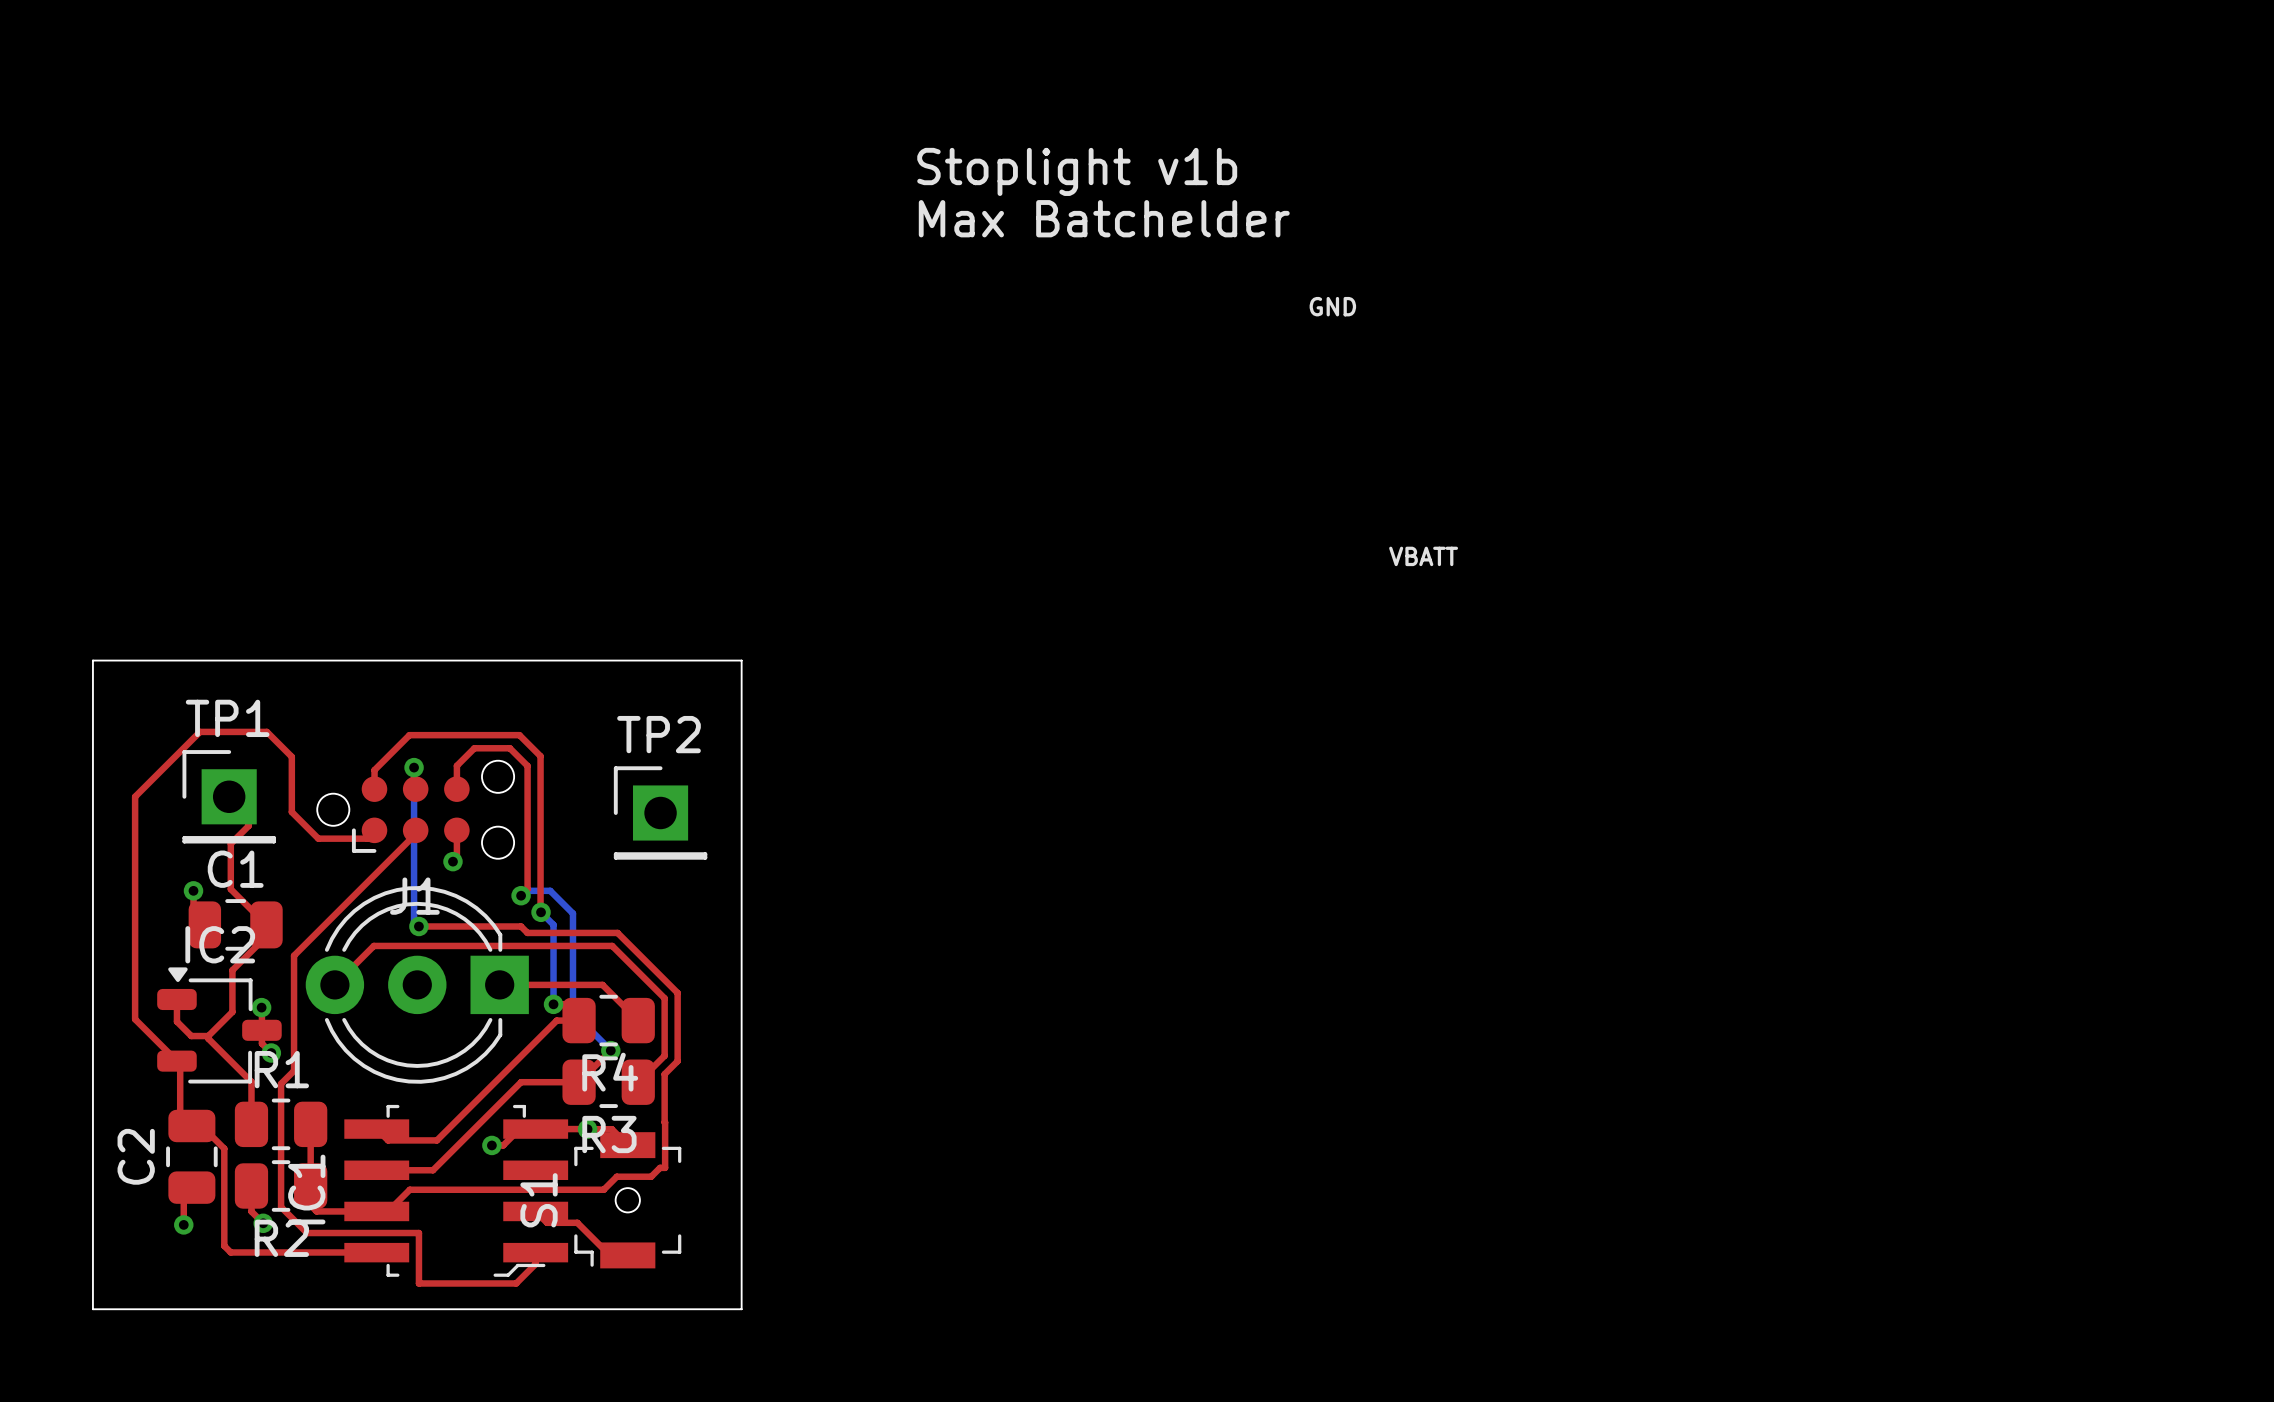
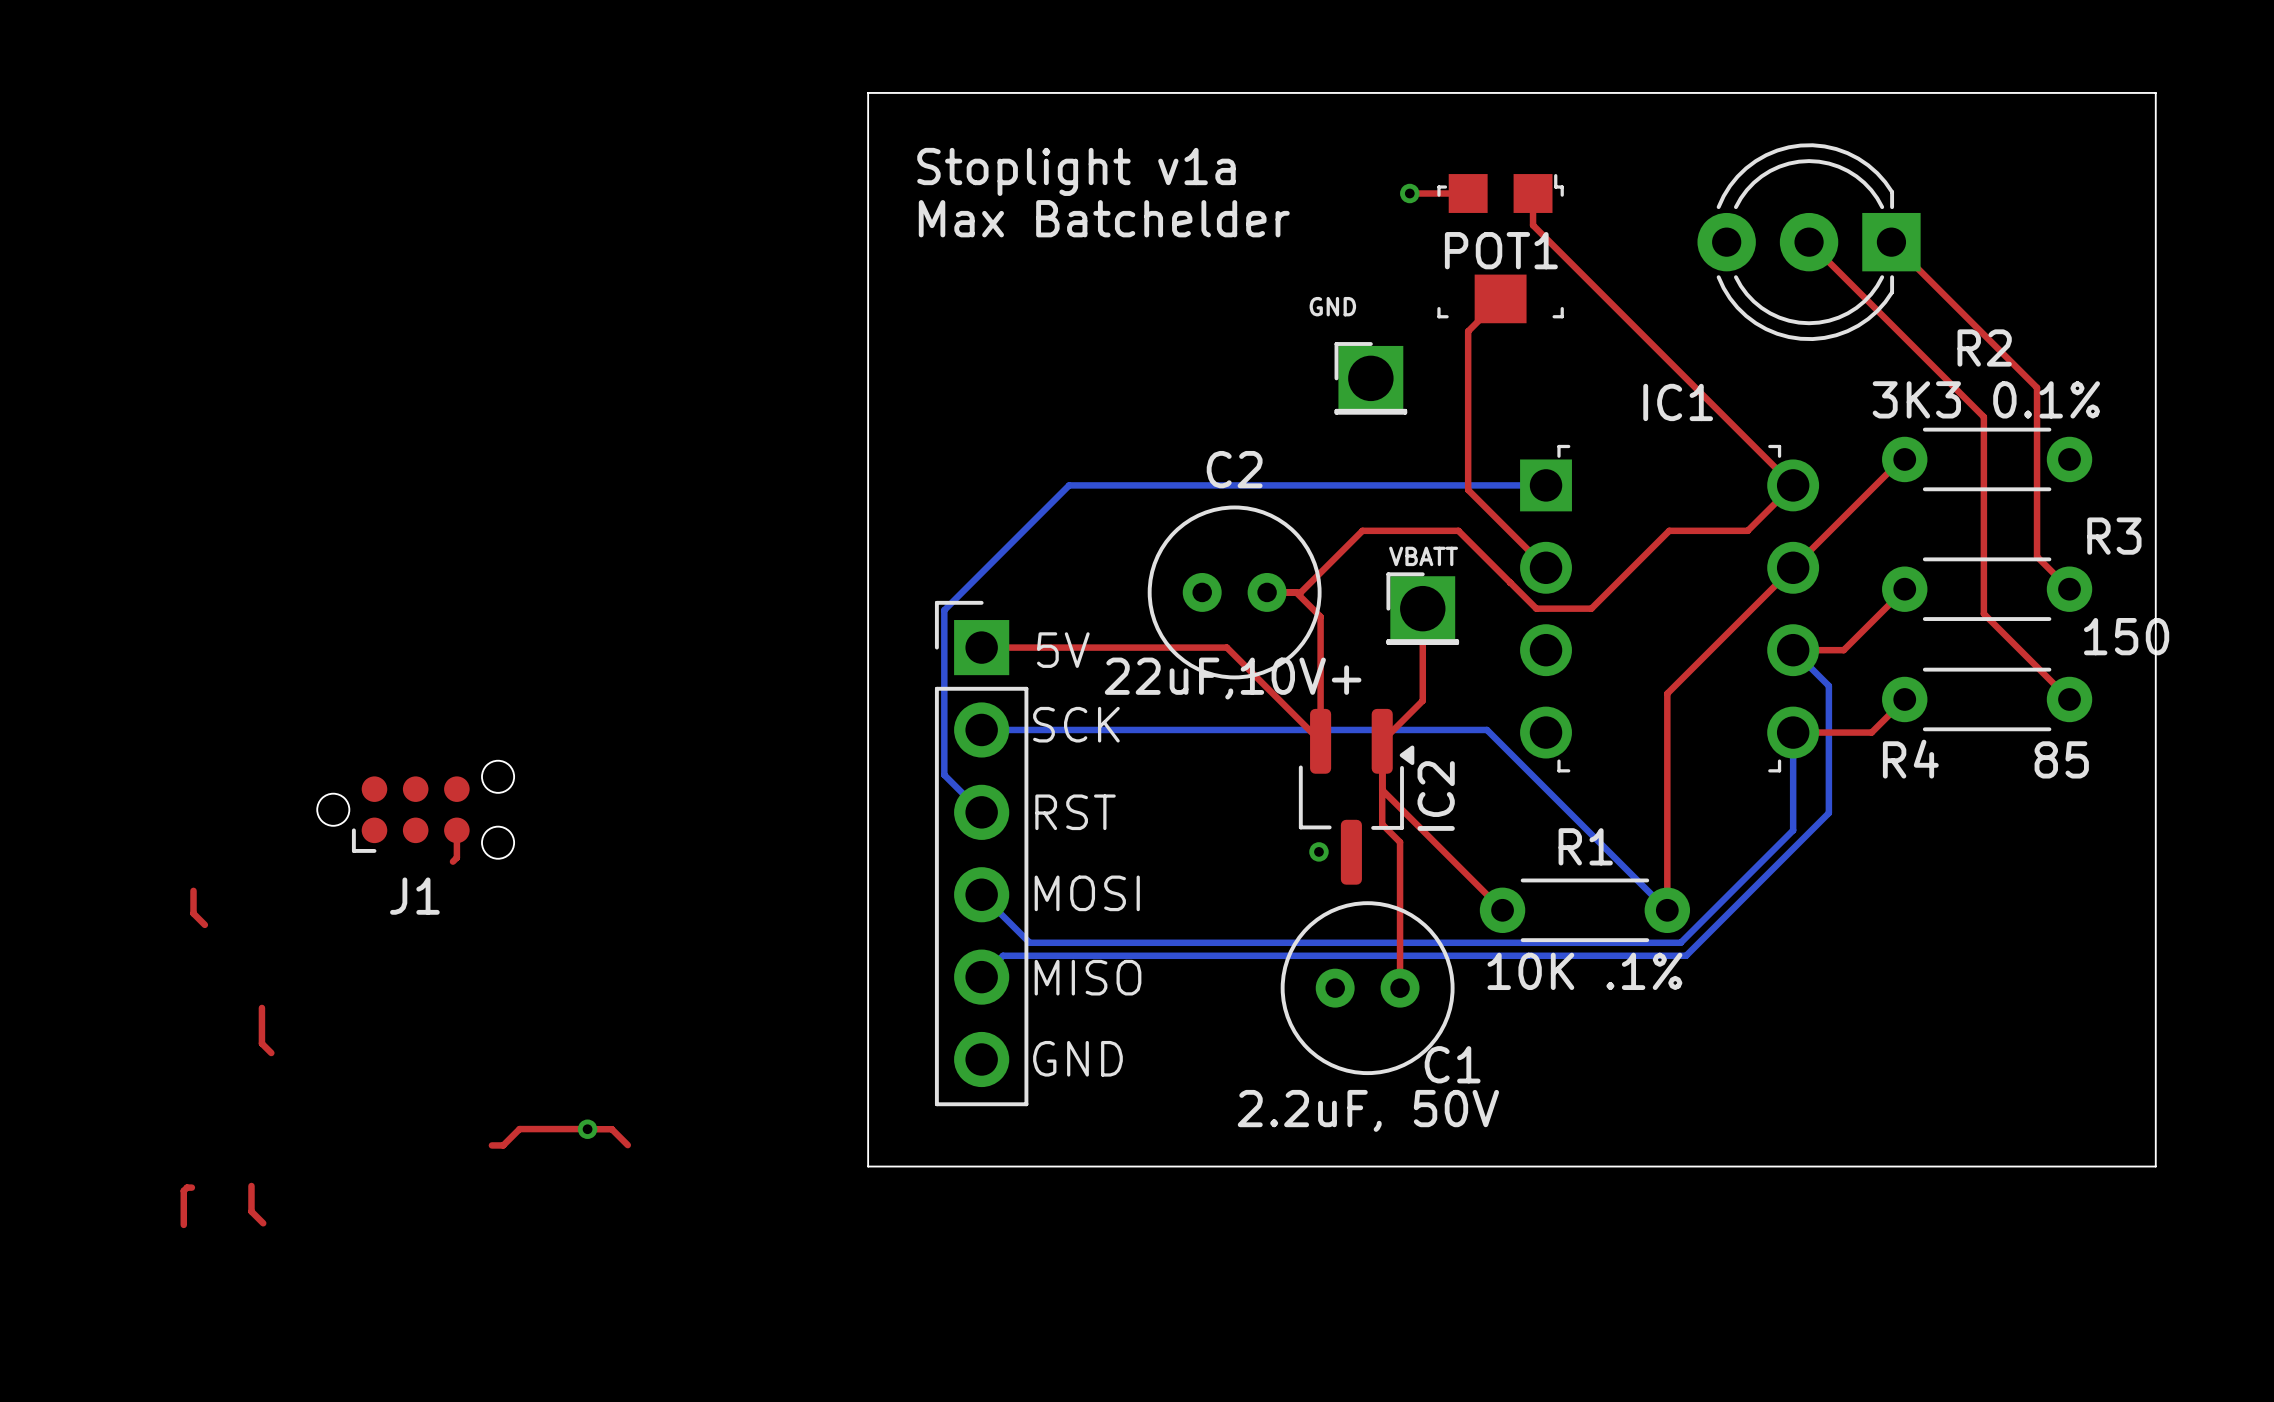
board edge: none -> (868, 92) (2155, 92) (2155, 1166) (868, 1166) (868, 92)
text: Stoplight v1b (1077, 171) -> Stoplight v1a (1076, 171)
top track: none -> (1409, 193) (1468, 193)
via: none -> (1409, 193)
top track: none -> (1533, 193) (1533, 225) (1793, 485) (1747, 530) (1669, 530) (1591, 608) (1536, 608) (1458, 530) (1362, 530) (1300, 592) (1267, 592)
top track: none -> (1809, 242) (1983, 416) (1983, 613) (2069, 699)
part: none -> (1809, 242)
top track: none -> (1891, 242) (2037, 387) (2037, 556) (2069, 589)
POT1: none -> (1500, 248)
top track: none -> (1500, 298) (1468, 331) (1468, 489) (1546, 567)
part: none -> (1370, 378)
R2 value: none -> 3K3 0.1% (1986, 399)
top track: none -> (1904, 459) (1901, 459) (1667, 693) (1667, 910)
bottom track: none -> (1546, 485) (1069, 485) (944, 610) (944, 775) (981, 812)
top track: none -> (1904, 589) (1843, 650) (1793, 650)
top track: none -> (1296, 592) (1320, 616) (1320, 741) (1226, 647) (981, 647)
top track: none -> (1422, 608) (1422, 700) (1382, 741) (1382, 824) (1400, 842) (1400, 988)
part: none -> (1422, 608)
R3 value: none -> 150 (2126, 636)
text: none -> 5V (1063, 650)
bottom track: none -> (1793, 650) (1828, 685) (1828, 813) (1686, 955) (1003, 955) (981, 977)
board edge: (92, 660) (741, 660) (741, 1309) (92, 1309) (92, 660) -> none
C2 value: none -> 22uF,10V+ (1233, 678)
top track: none -> (1904, 699) (1871, 732) (1793, 732)
text: none -> SCK (1076, 724)
bottom track: none -> (981, 729) (1486, 729) (1667, 910)
bottom track: none -> (1793, 732) (1793, 830) (1680, 942) (1029, 942) (981, 894)
R4 value: none -> 85 (2061, 759)
bottom track: (414, 767) (414, 921) (418, 926) -> none
via: (414, 767) -> none
top track: (374, 789) (374, 770) (409, 735) (519, 735) (540, 756) (541, 912) -> none
top track: (456, 789) (456, 765) (474, 748) (509, 748) (527, 765) (527, 889) (521, 895) -> none
top track: none -> (1382, 789) (1502, 910)
top track: (229, 796) (248, 816) (248, 825) (230, 843) (230, 889) (266, 924) (266, 936) (232, 970) (232, 1011) (208, 1036) -> none
TP1: (229, 796) -> none
text: none -> RST (1075, 812)
TP2: (660, 813) -> none
top track: (374, 830) (367, 838) (318, 838) (291, 812) (291, 756) (266, 731) (199, 731) (135, 796) (135, 1019) (180, 1064) (180, 1125) -> none
top track: (415, 830) (411, 837) (294, 955) (294, 1070) (281, 1083) (281, 1207) (307, 1233) (418, 1233) (418, 1283) (516, 1283) (535, 1264) (535, 1252) -> none
via: none -> (1318, 851)
part: none -> (981, 853)
via: (452, 861) -> none
C1 name position: C1 (235, 869) -> C1 (1452, 1064)
via: (193, 890) -> none
text: none -> MOSI (1087, 893)
bottom track: (521, 895) (525, 890) (550, 890) (572, 913) (572, 1012) (611, 1050) -> none
via: (521, 895) -> none
C1 footprint: [188, 899, 283, 951] -> [1280, 901, 1455, 1076]
bottom track: (541, 912) (553, 924) (553, 1004) -> none
via: (541, 912) -> none
top track: (418, 926) (521, 926) (527, 932) (617, 932) (677, 992) (677, 1061) (664, 1074) (664, 1122) -> none
via: (418, 926) -> none
IC2 name position: IC2 (220, 944) -> IC2 (1436, 796)
IC2 footprint: [157, 967, 282, 1084] -> [1298, 708, 1415, 885]
R1 value: none -> 10K .1% (1584, 971)
text: none -> MISO (1088, 977)
top track: (334, 984) (373, 945) (612, 945) (664, 998) (664, 1055) (638, 1082) -> none
part: (417, 984) -> none
top track: (499, 984) (602, 984) (638, 1020) -> none
R4 footprint: [562, 994, 655, 1047] -> [1882, 667, 2093, 732]
top track: (176, 999) (176, 1021) (191, 1036) (208, 1036) -> none
top track: (553, 1004) (562, 1004) (579, 1020) (556, 1020) (436, 1140) (388, 1140) (376, 1129) -> none
via: (553, 1004) -> none
via: (261, 1007) -> none
top track: (208, 1036) (208, 1038) (251, 1081) (251, 1124) -> none
top track: (610, 1050) (579, 1082) (521, 1082) (433, 1170) (376, 1170) -> none
via: (610, 1050) -> none
via: (271, 1053) -> none
R3 footprint: [562, 1056, 655, 1108] -> [1882, 557, 2093, 621]
text: none -> GND (1077, 1058)
R4 name position: R4 (610, 1072) -> R4 (1910, 759)
R1 footprint: [234, 1098, 328, 1151] -> [1479, 878, 1691, 943]
IC1 footprint: [344, 1104, 569, 1277] -> [1520, 444, 1820, 773]
C2 footprint: [166, 1109, 218, 1204] -> [1147, 505, 1322, 680]
C1 value: none -> 2.2uF, 50V (1368, 1110)
top track: (665, 1122) (665, 1167) (660, 1167) (651, 1176) (616, 1176) (603, 1189) (409, 1189) (388, 1211) (316, 1211) (310, 1205) (310, 1124) -> none
top track: (180, 1125) (201, 1125) (224, 1148) (224, 1245) (230, 1252) (376, 1252) -> none
R3 name position: R3 (609, 1134) -> R3 (2114, 536)
via: (491, 1145) -> none
C2 name position: C2 (136, 1156) -> C2 (1234, 469)
R2 footprint: [234, 1160, 328, 1212] -> [1882, 427, 2093, 492]
IC1 name position: IC1 (306, 1189) -> IC1 (1678, 402)
S1: (627, 1200) -> none
top track: (535, 1211) (547, 1222) (577, 1222) (602, 1247) -> none
via: (263, 1223) -> none
via: (183, 1224) -> none
R2 name position: R2 (281, 1238) -> R2 (1984, 347)

